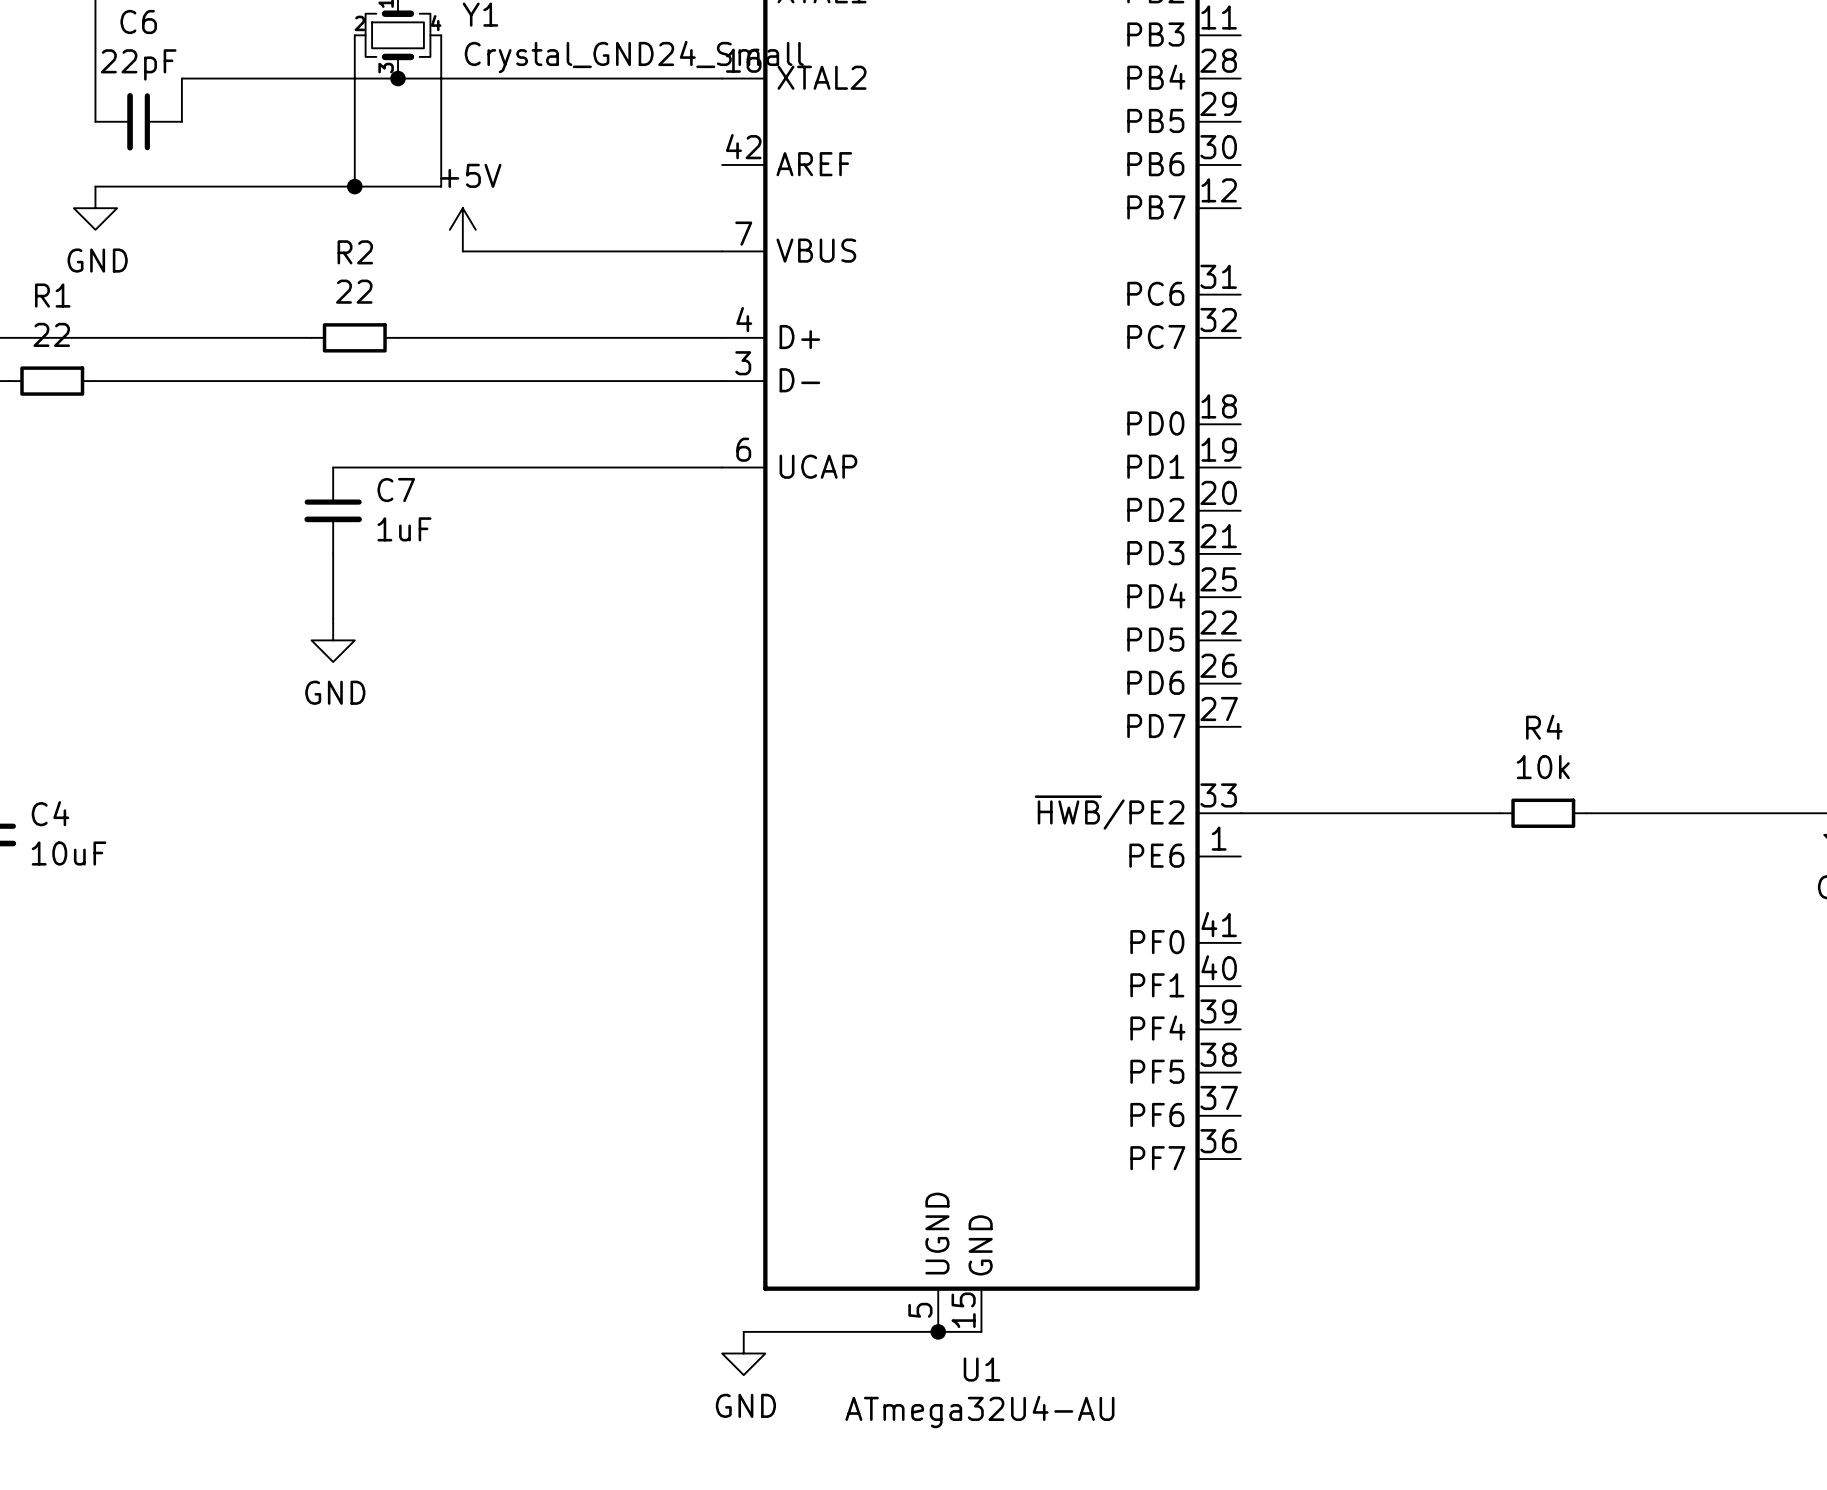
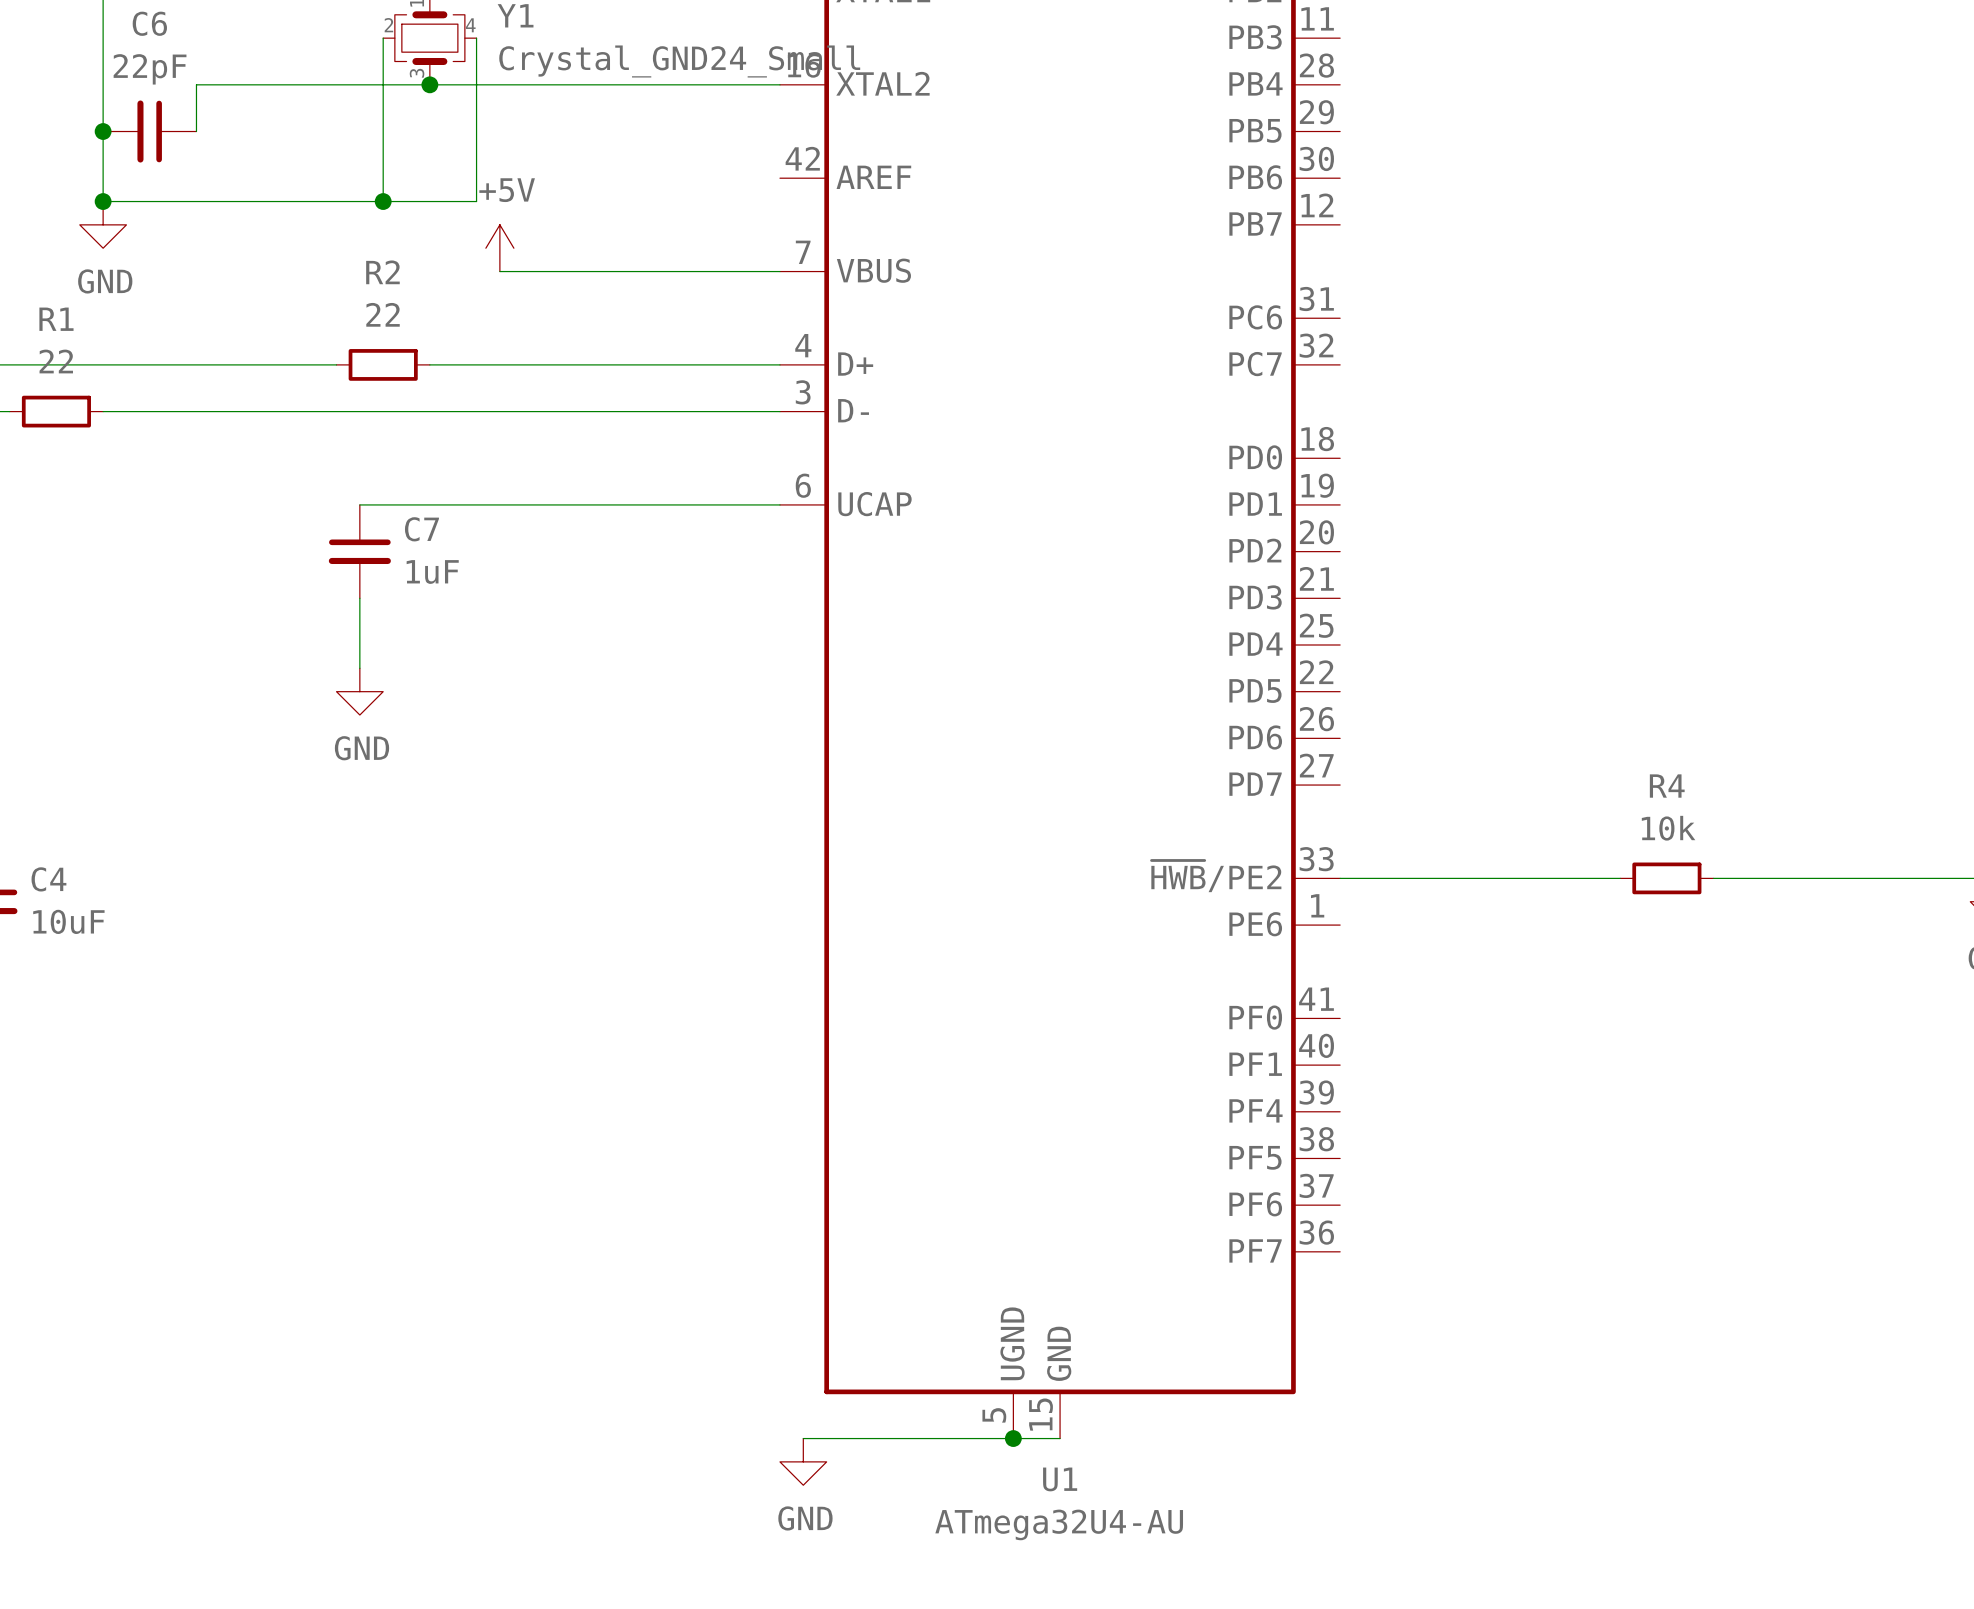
wire: none -> (103, 131) (103, 201)
junction: none -> (103, 131)
junction: none -> (103, 201)

